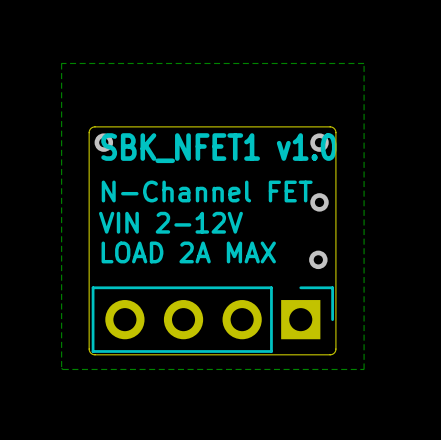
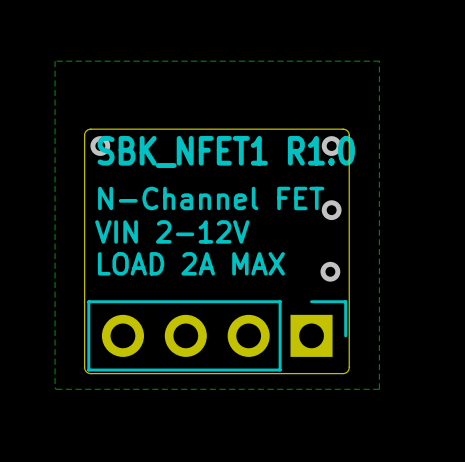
text: SBK_NFET1 v1.0 (218, 148) -> SBK_NFET1 R1.0 (226, 151)

